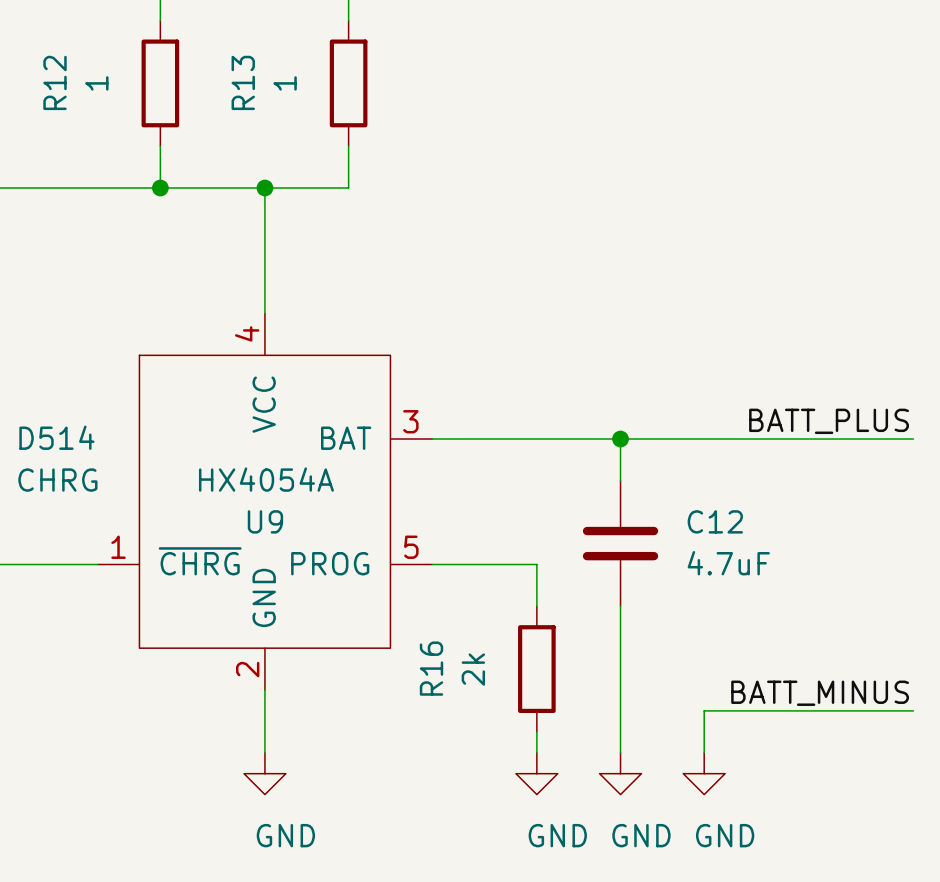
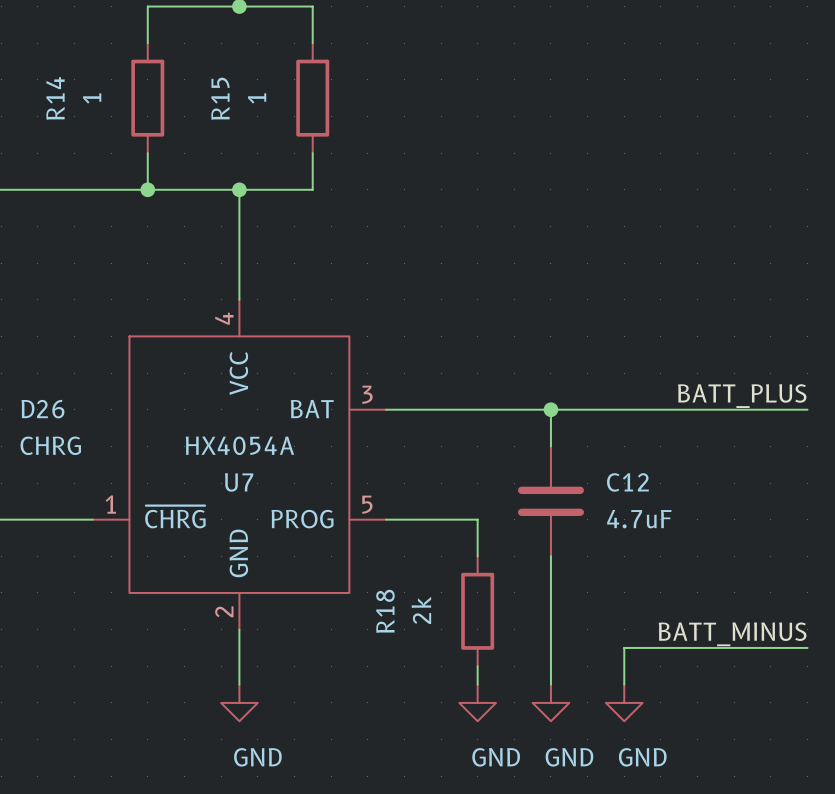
R12 name: R12 (55, 82) -> R14 (55, 98)
R13 name: R13 (243, 82) -> R15 (220, 98)
D514 name: D514 (56, 437) -> D26 (42, 409)
U9 name: U9 (265, 521) -> U7 (239, 482)
R16 name: R16 (431, 668) -> R18 (385, 611)

